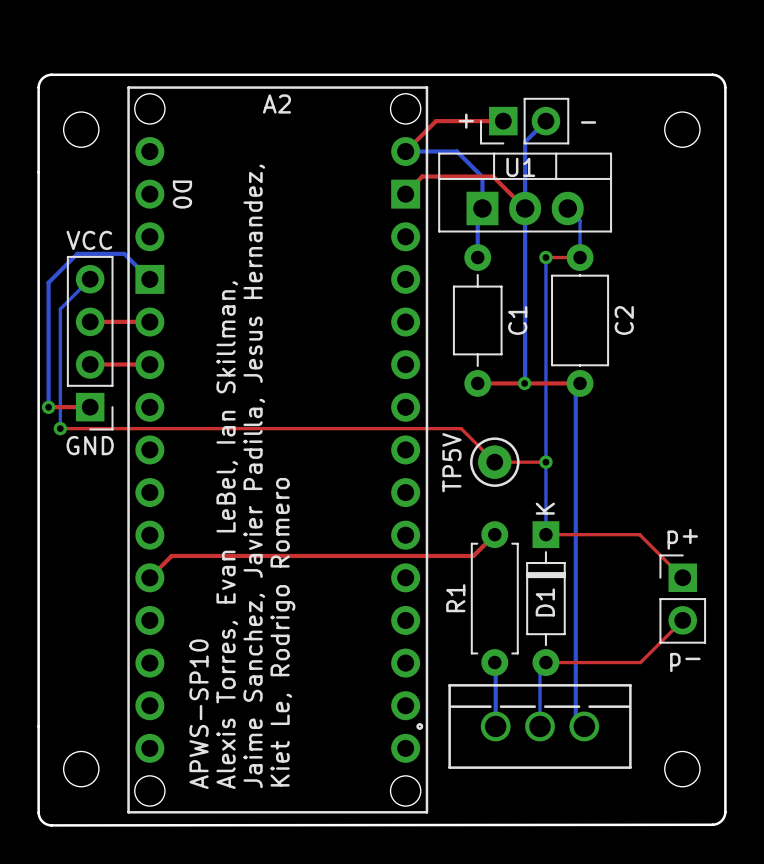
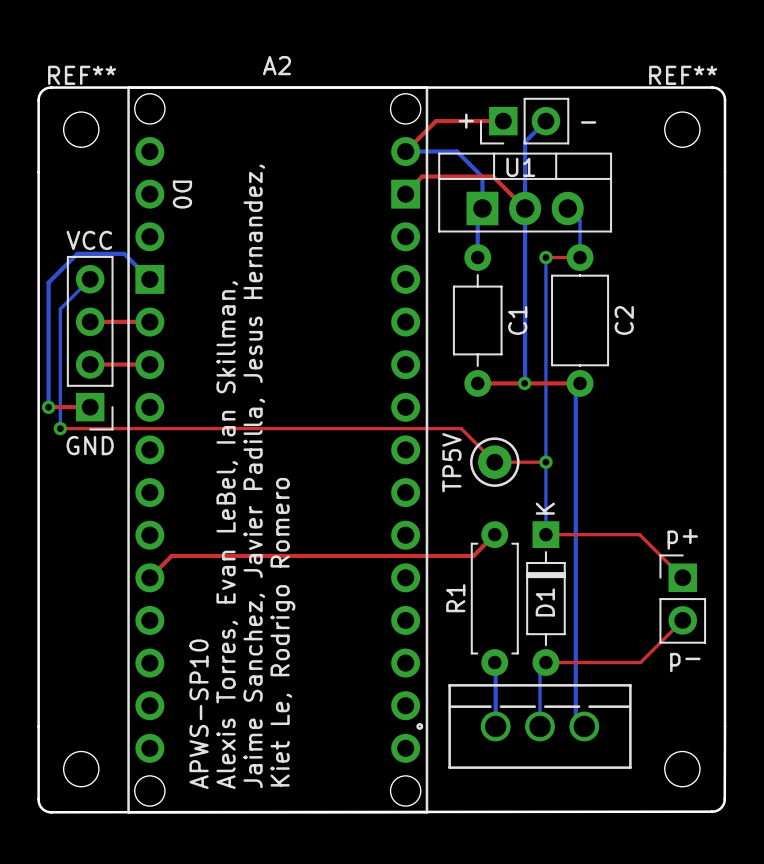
REF** name: none -> REF** (82, 75)
REF** name: none -> REF** (683, 75)
board edge: (38, 100) (39, 82) (45, 76) (51, 74) (712, 74) (721, 78) (725, 87) (725, 811) (721, 820) (712, 824) (51, 825) (45, 823) (39, 817) (38, 799) -> (38, 100) (42, 91) (51, 87) (712, 87) (721, 91) (725, 100) (724, 798) (721, 808) (711, 811) (51, 812) (42, 808) (38, 799)
A2 name position: A2 (276, 103) -> A2 (276, 65)

